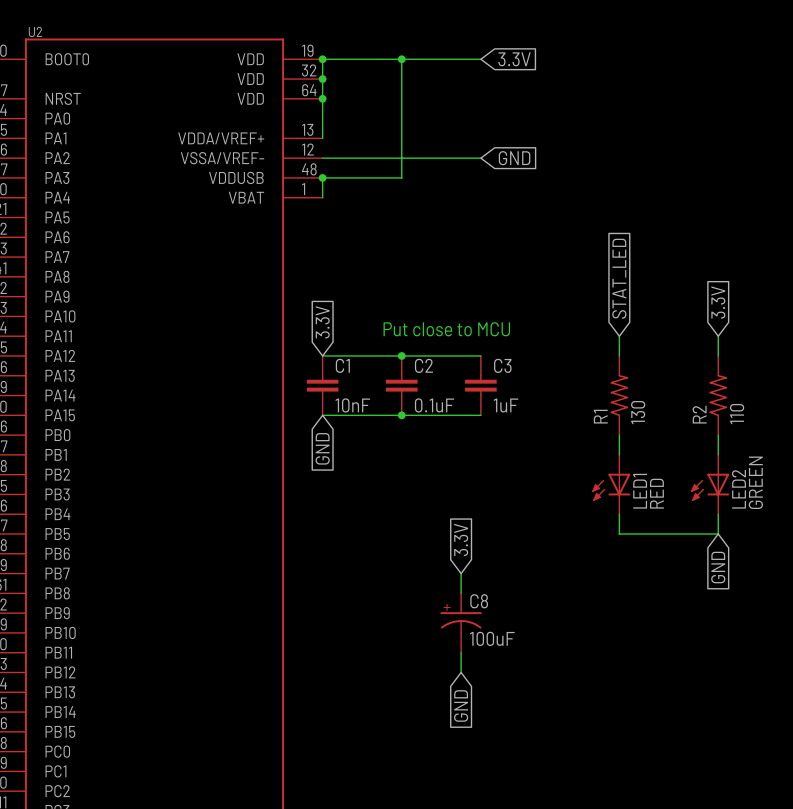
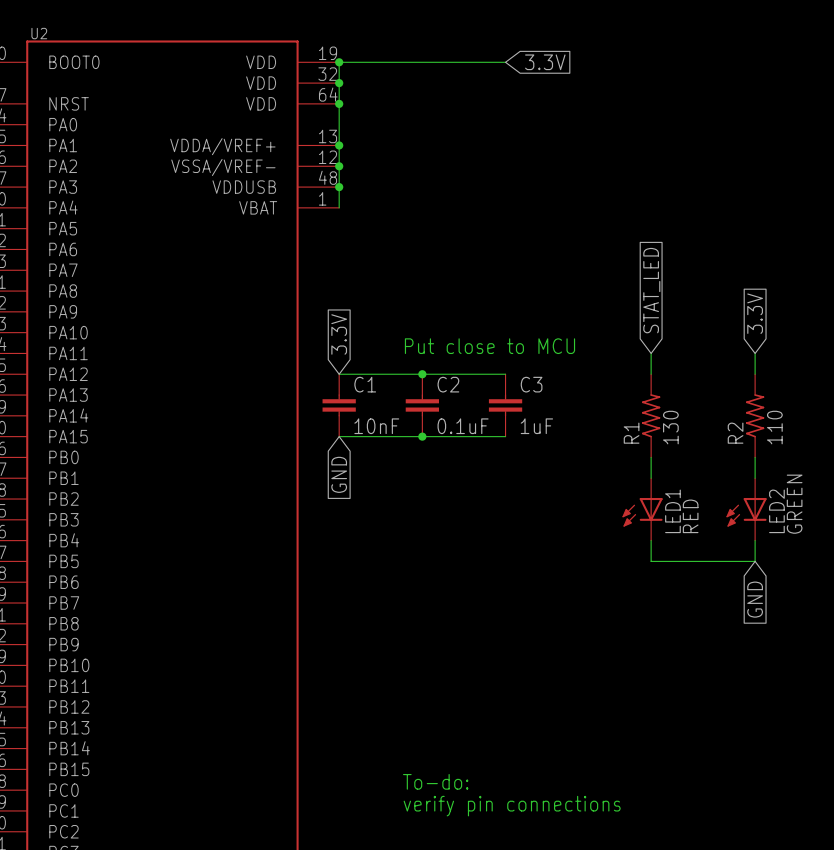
wire: (401, 59) (401, 177) (322, 177) -> (339, 145) (339, 187)
junction: (401, 59) -> none
junction: none -> (339, 145)
wire: (322, 158) (480, 158) -> none
junction: none -> (339, 166)
global label: GND (514, 158) -> none
global label: 3.3V (461, 539) -> none
wire: (461, 573) (461, 593) -> none
C8: 100uF (461, 623) -> none
wire: (461, 652) (461, 672) -> none
global label: GND (461, 705) -> none
text: none -> To-do: (435, 781)
text: none -> verify pin connections (512, 806)

